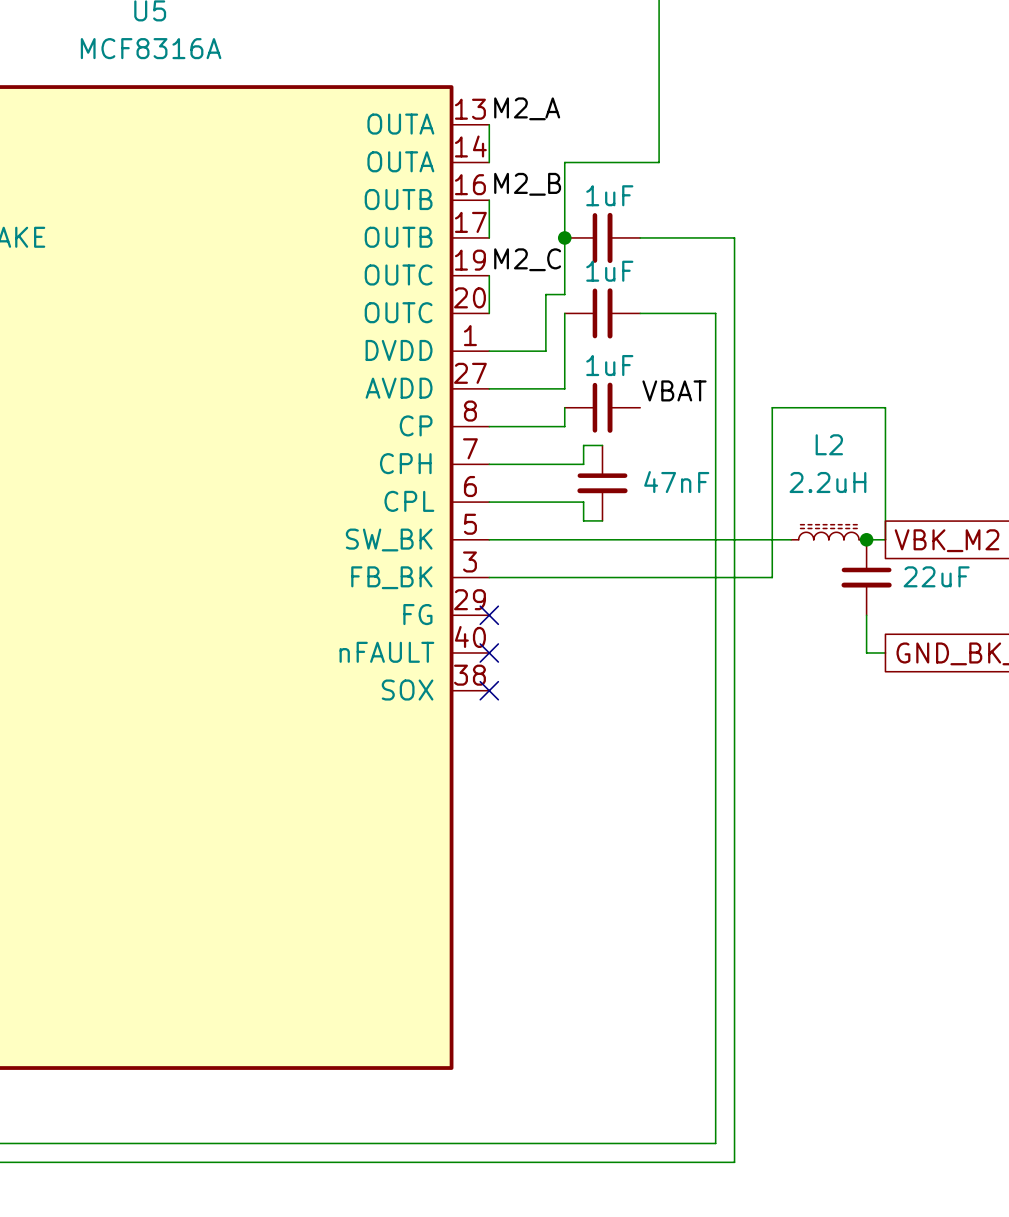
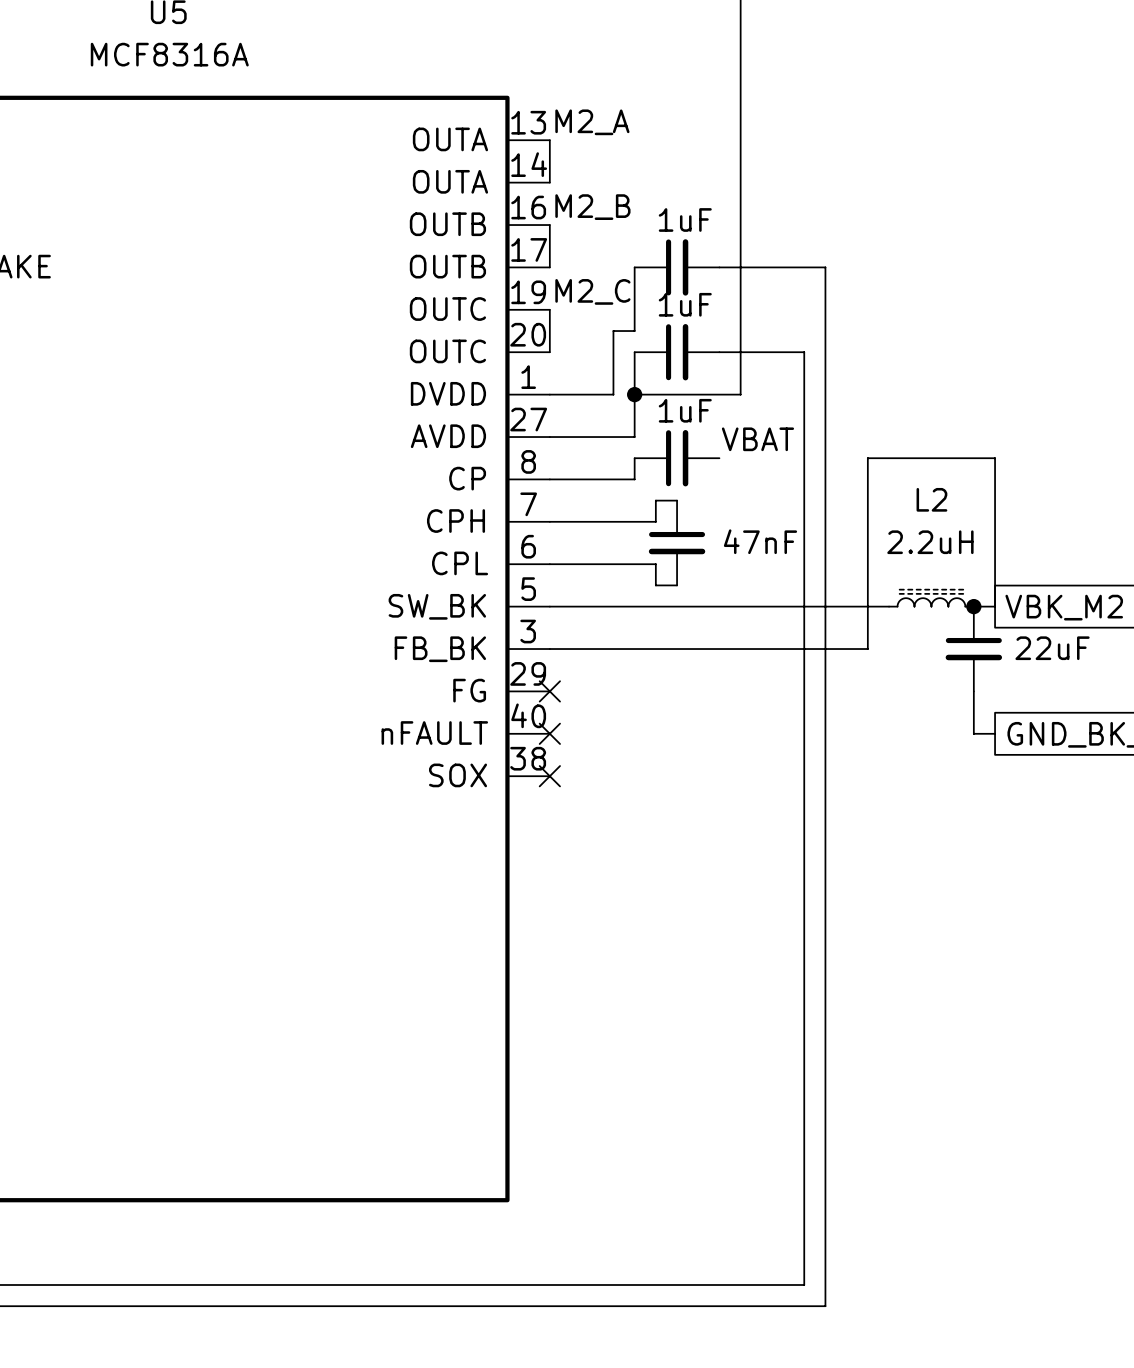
wire: (659, 162) (564, 162) (564, 237) -> (740, 182) (740, 394) (634, 394)
junction: (564, 237) -> none
junction: none -> (634, 394)

